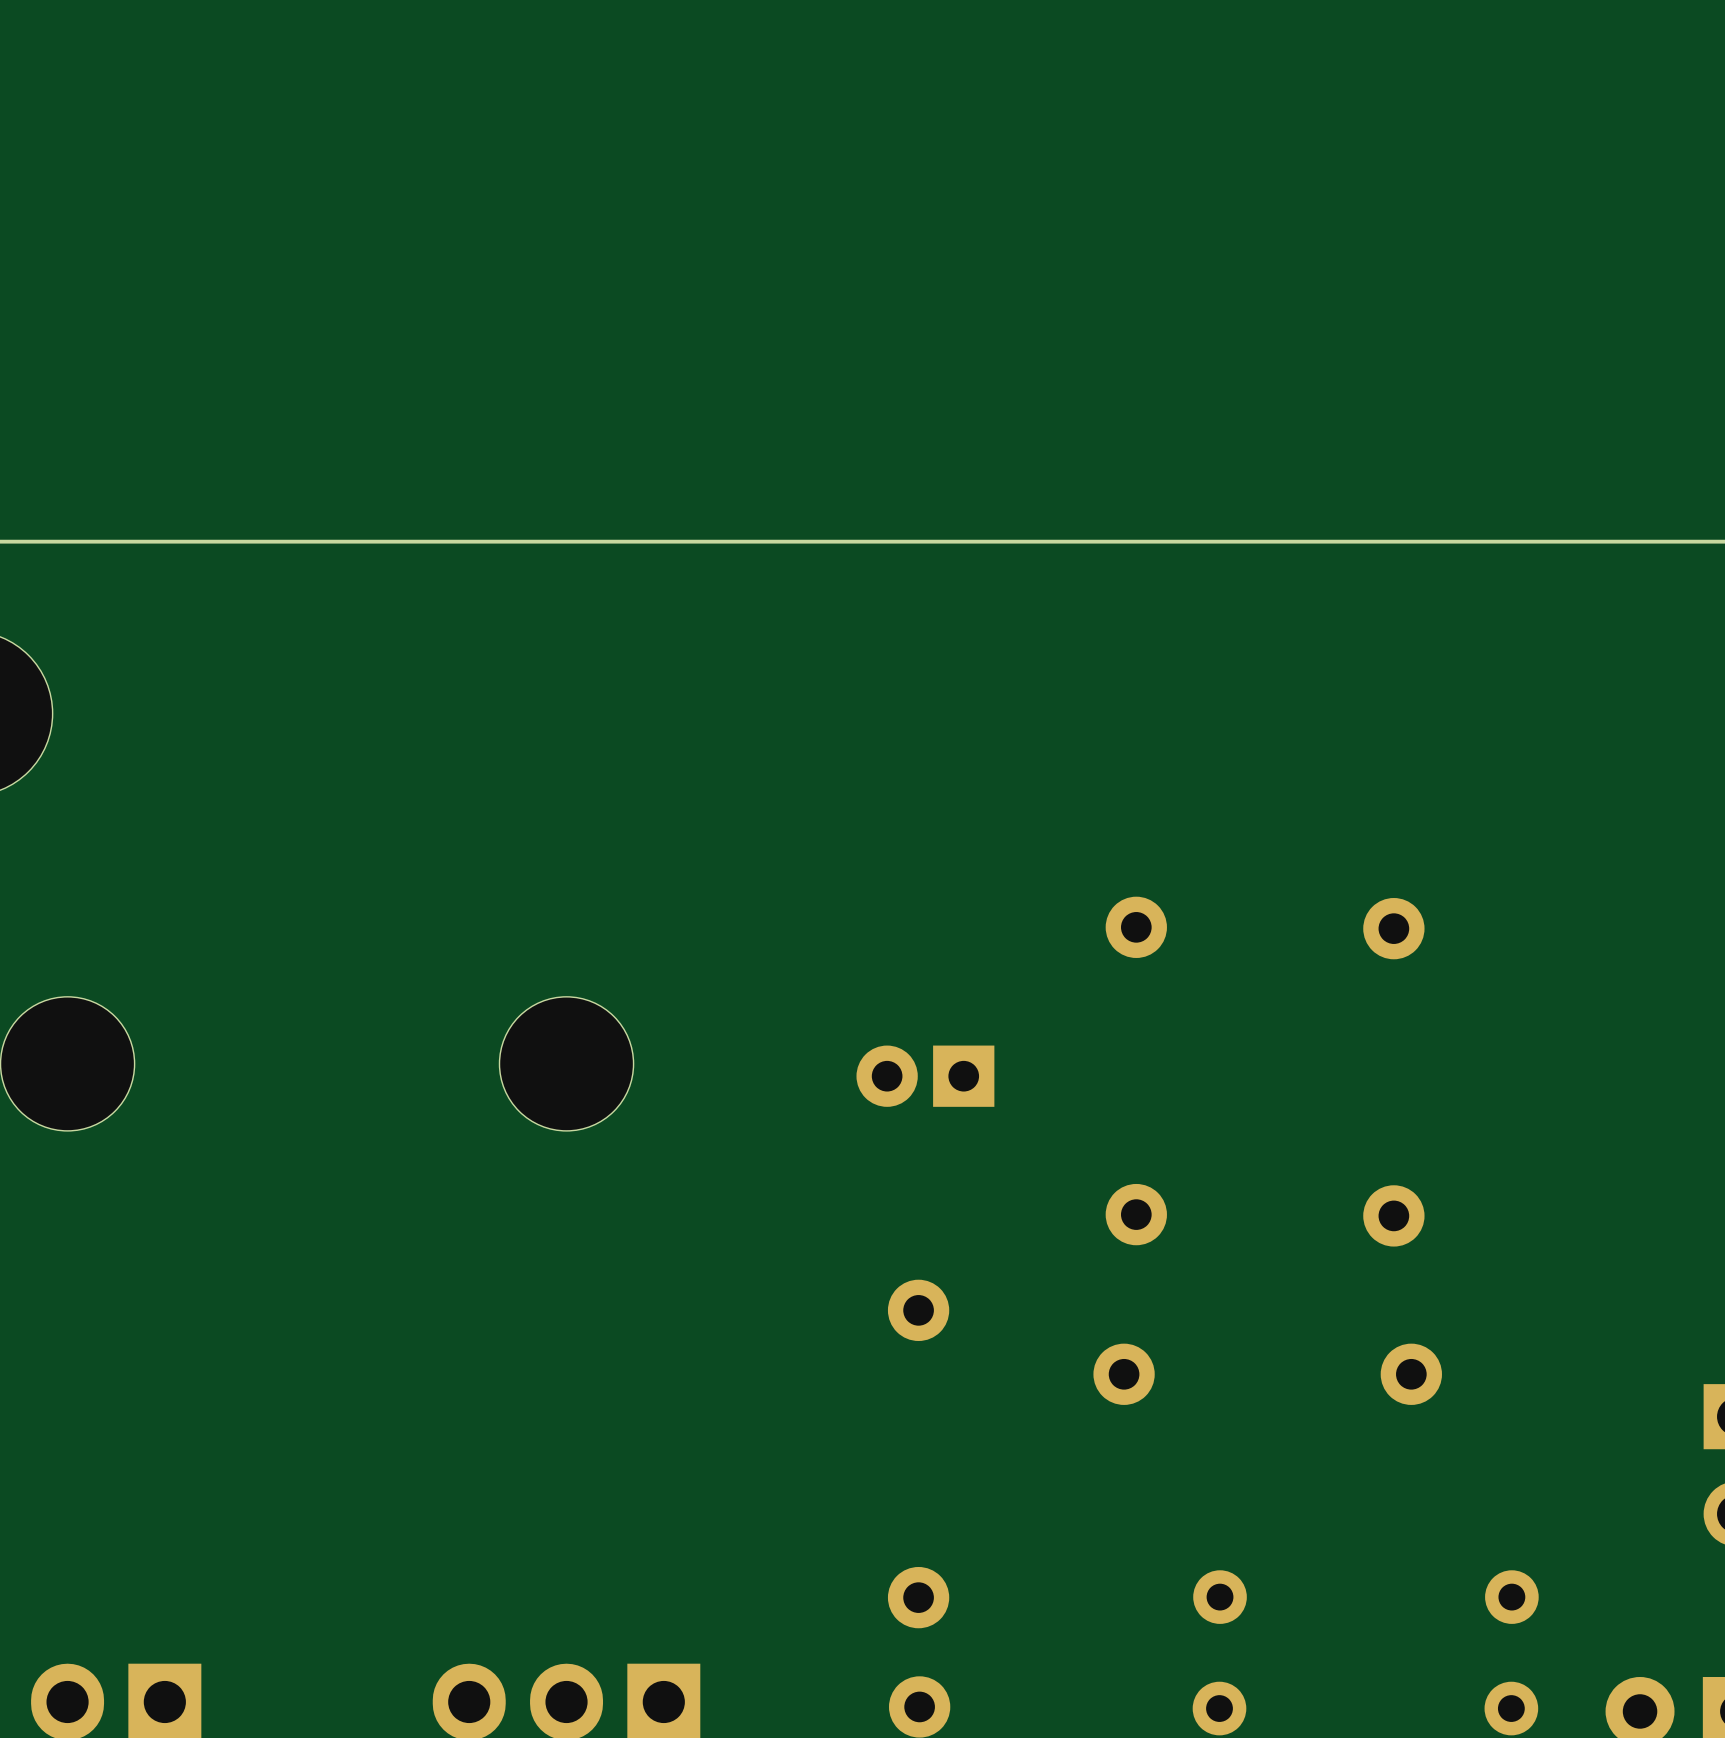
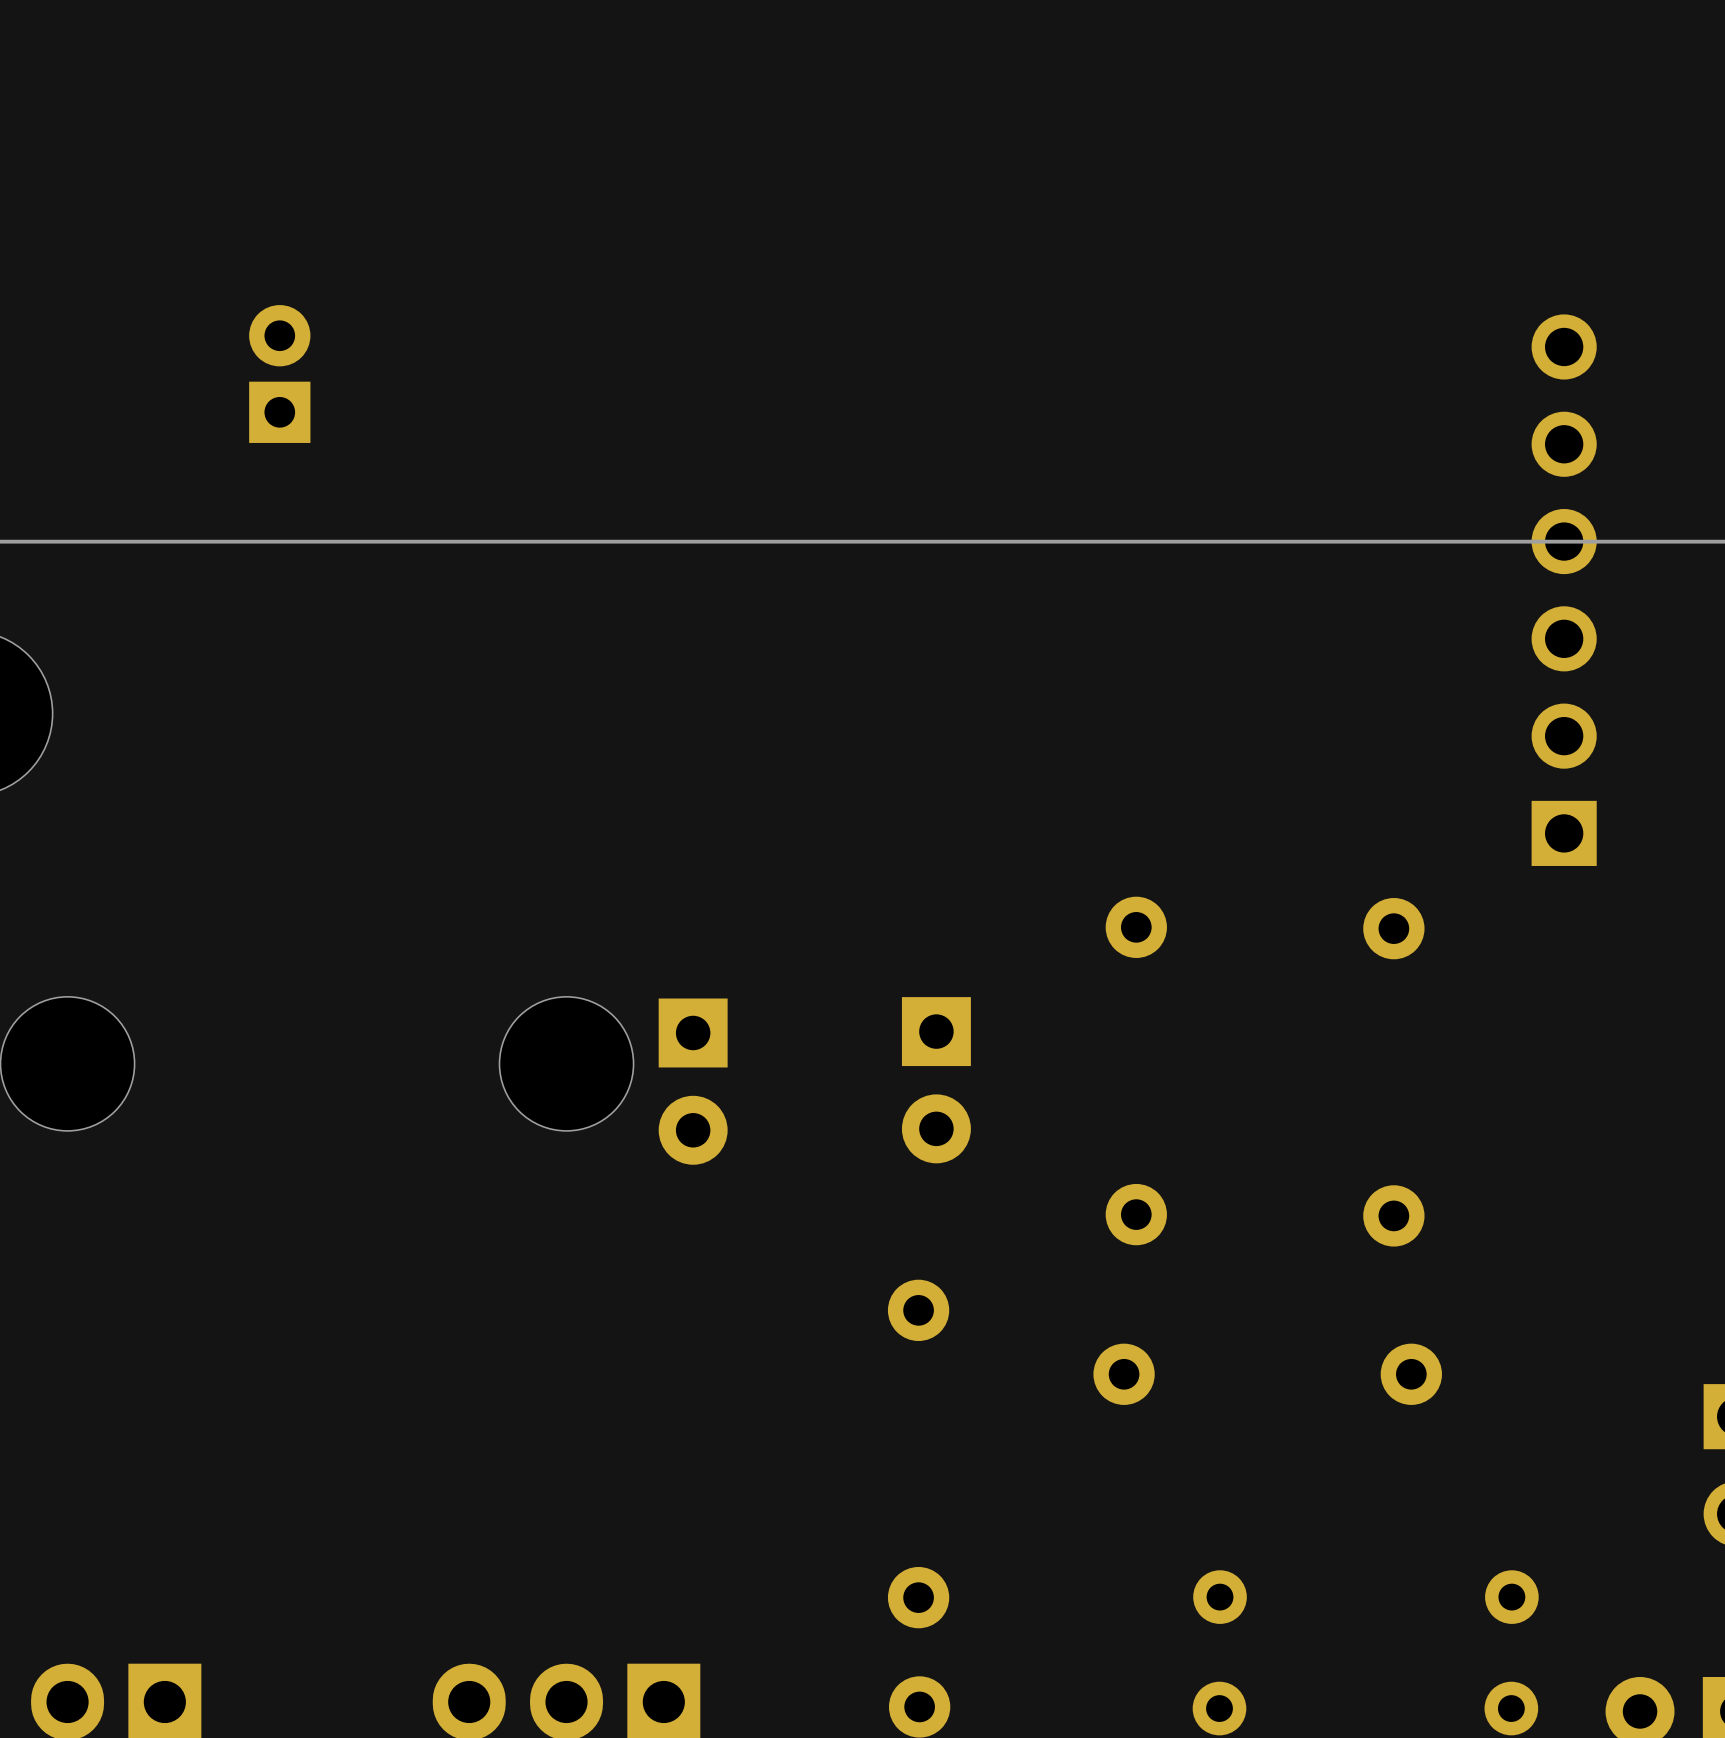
part: none -> (279, 374)
part: none -> (1564, 590)
part footprint: [856, 1045, 995, 1107] -> [901, 997, 971, 1164]
part: none -> (693, 1081)

